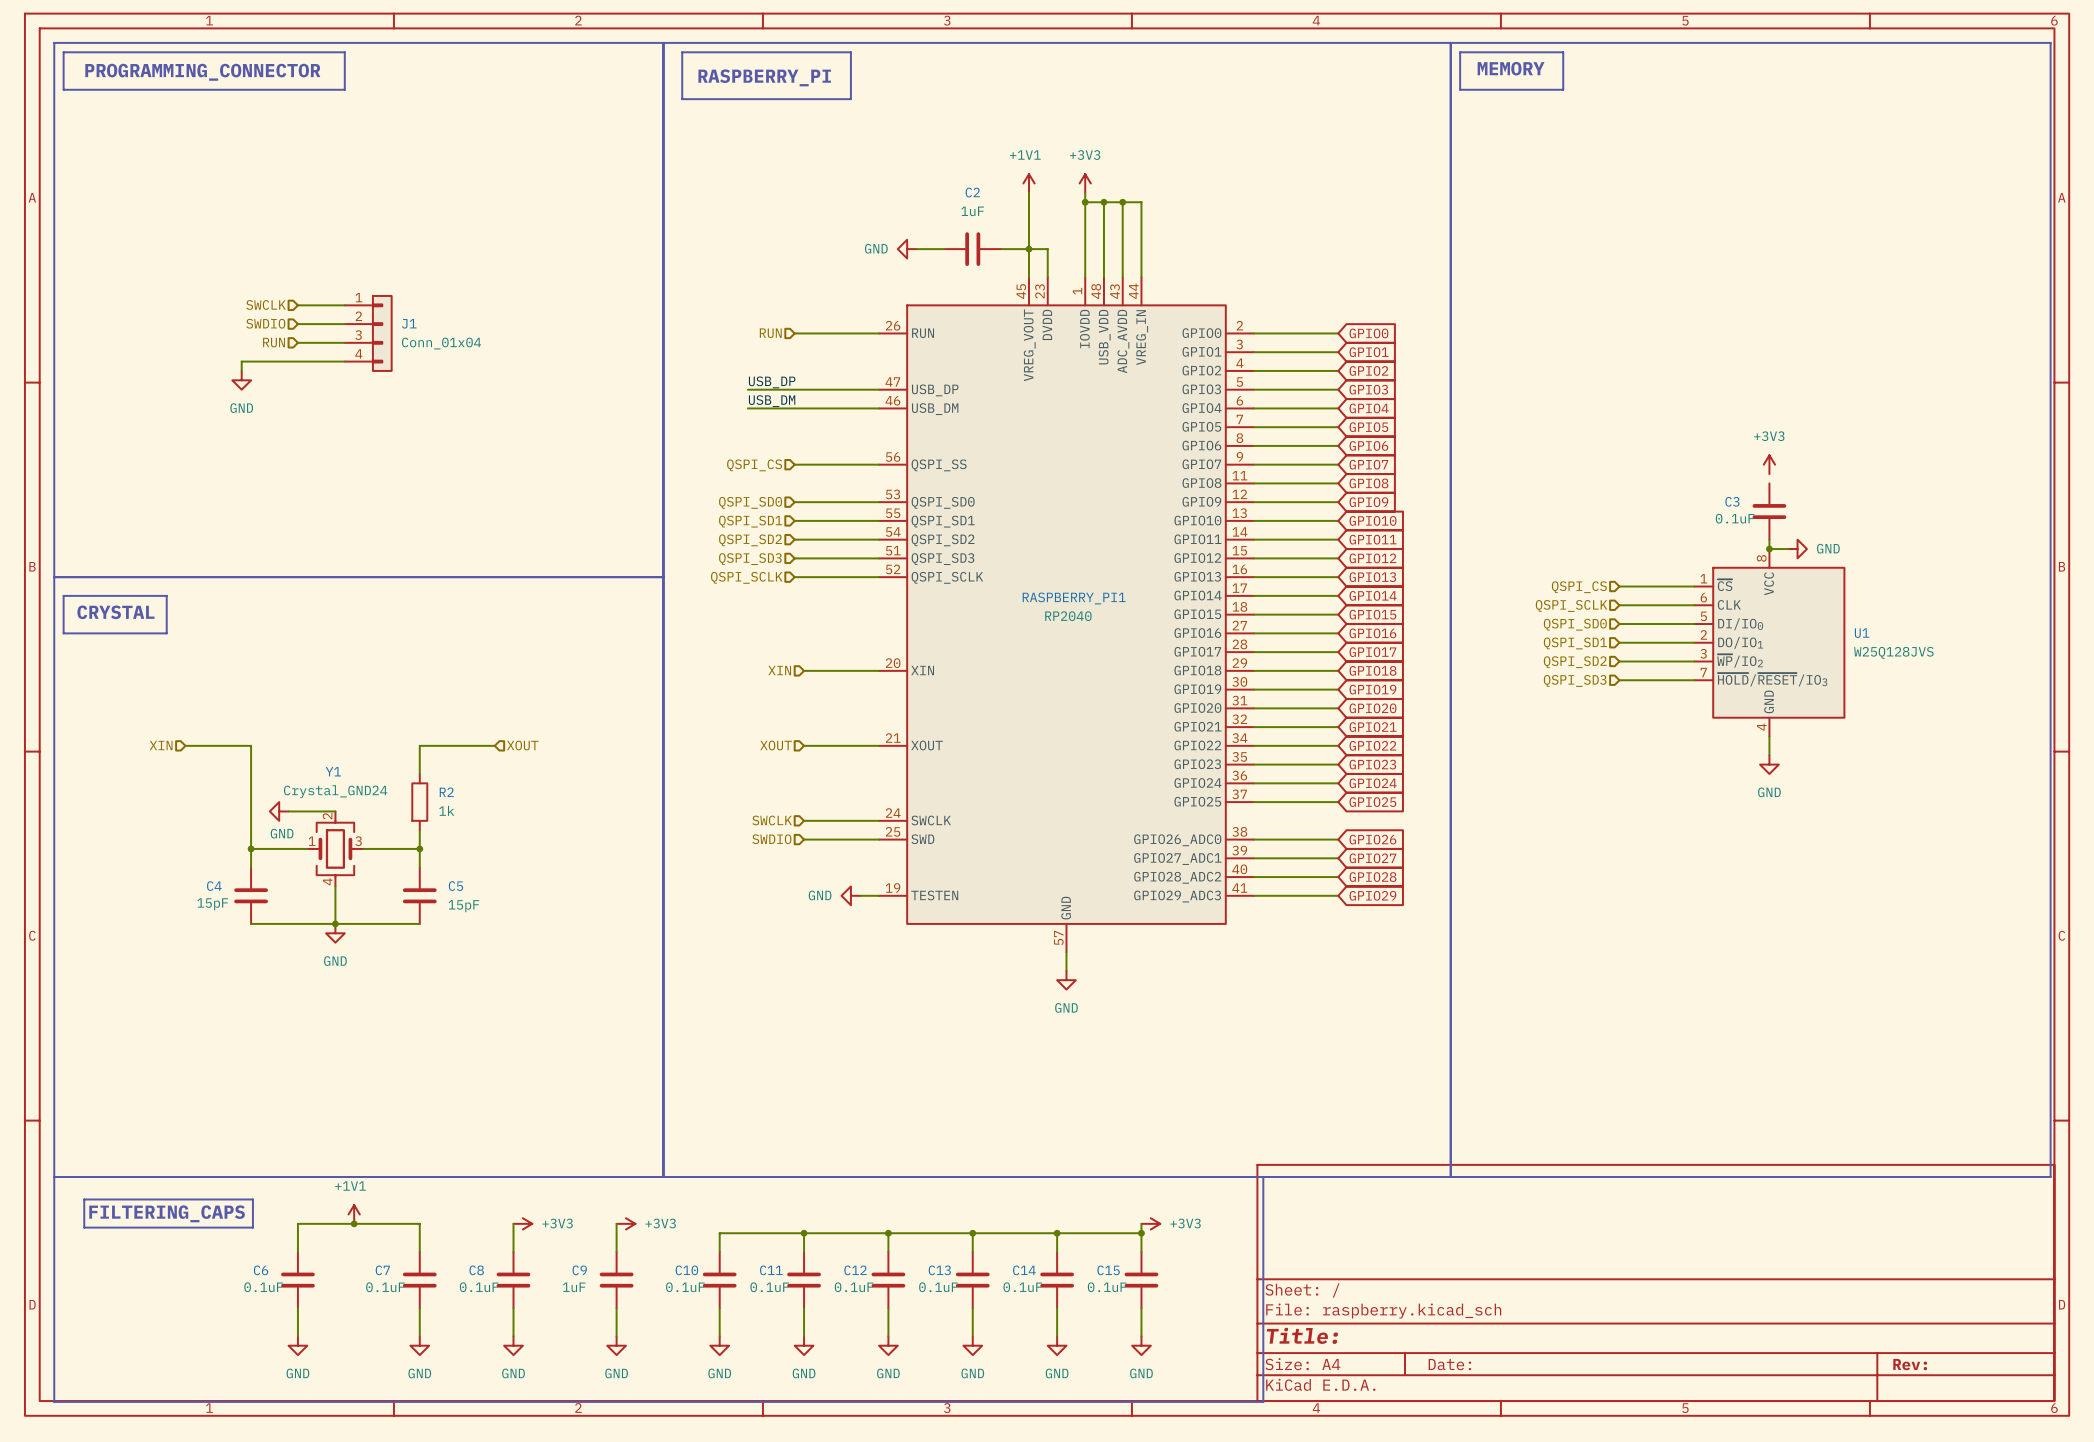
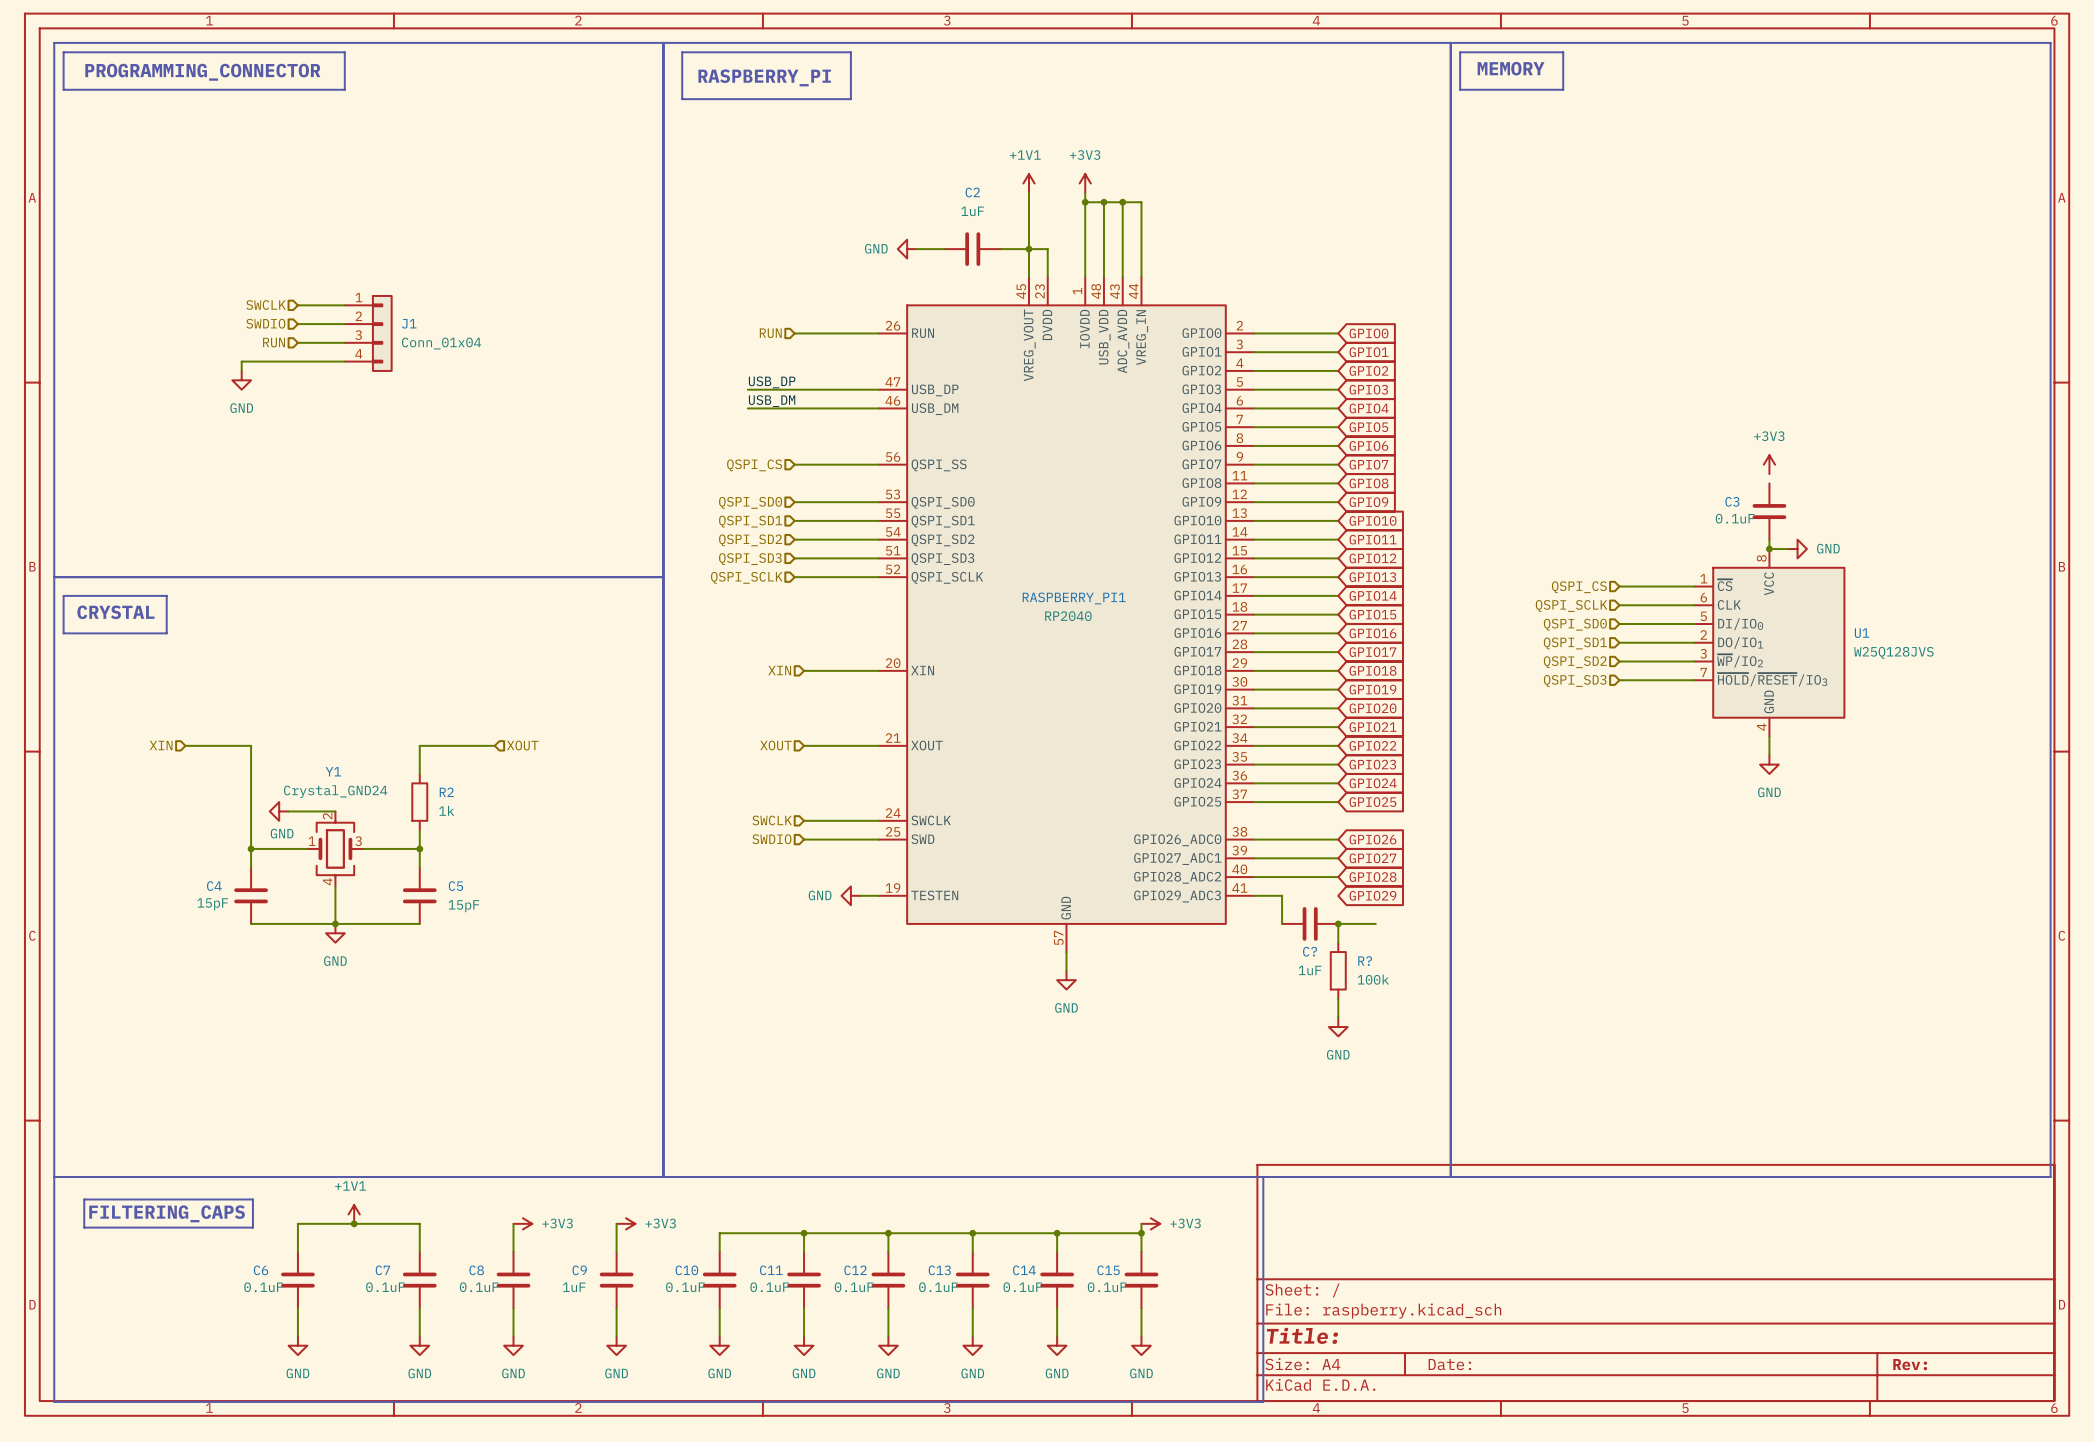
wire: (1282, 895) (1338, 895) -> (1282, 895) (1282, 923)
C?: none -> 1uF (1310, 923)
junction: none -> (1338, 923)
wire: none -> (1375, 923) (1338, 923) (1338, 942)
R?: none -> 100k (1338, 970)
wire: none -> (1338, 998) (1338, 1017)
power symbol: none -> GND (1338, 1027)

